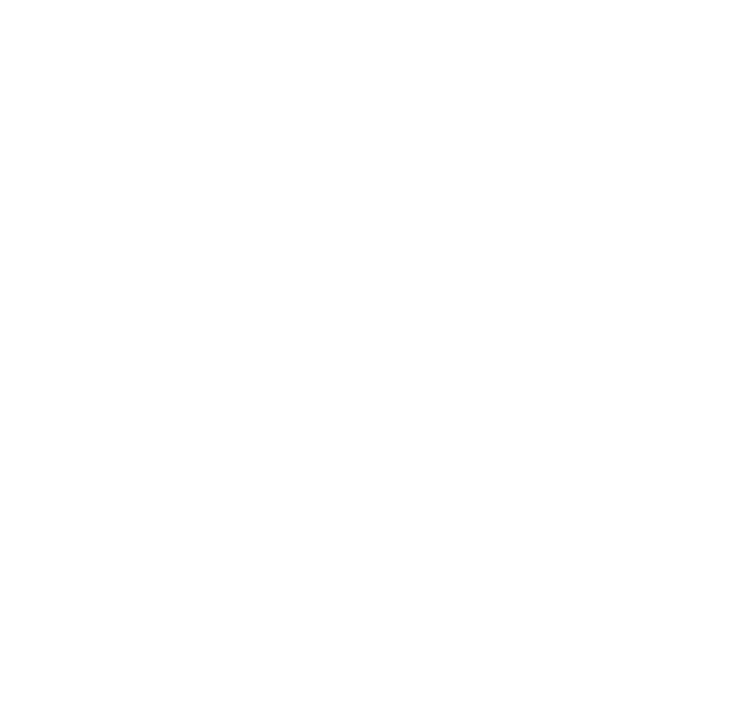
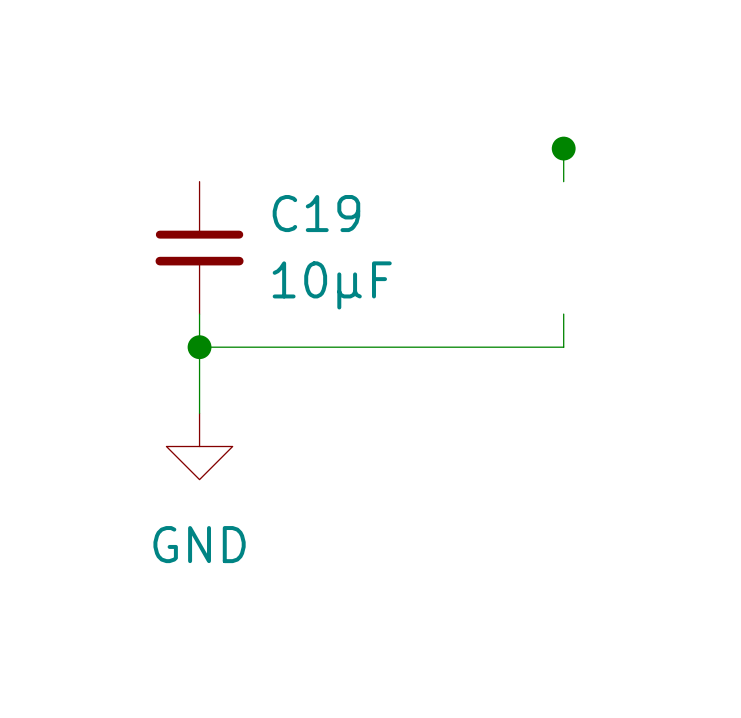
wire: none -> (563, 148) (563, 181)
junction: none -> (563, 148)
C19: none -> 10µF (199, 247)
wire: none -> (199, 314) (199, 413)
wire: none -> (563, 314) (563, 347) (199, 347)
junction: none -> (199, 347)
power symbol: none -> GND (199, 446)

